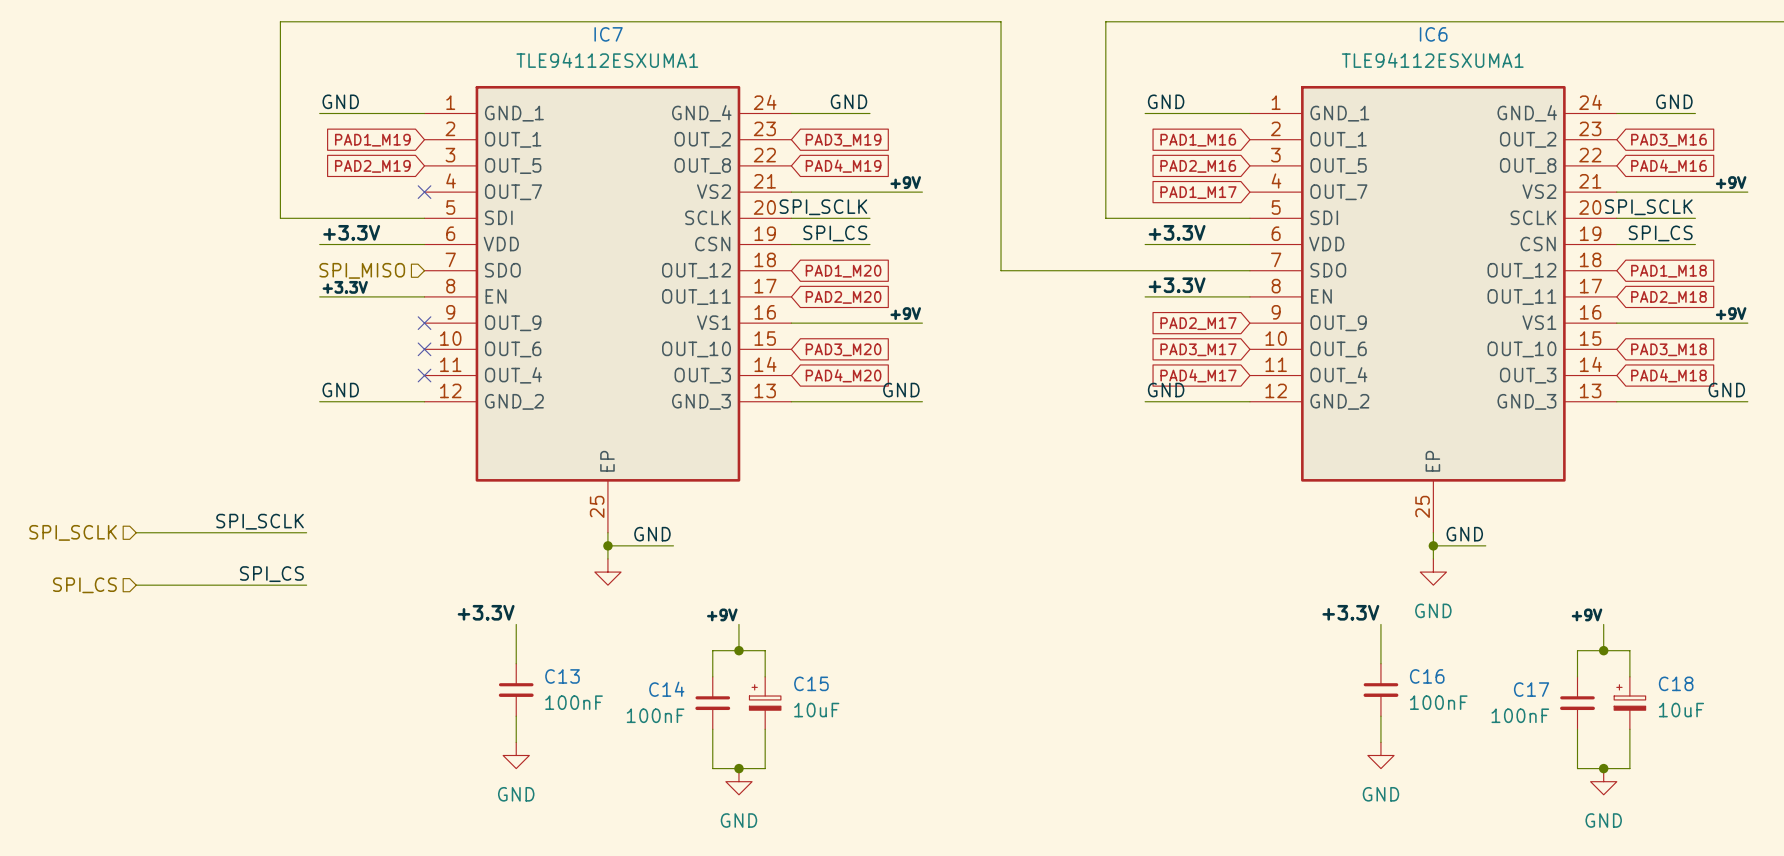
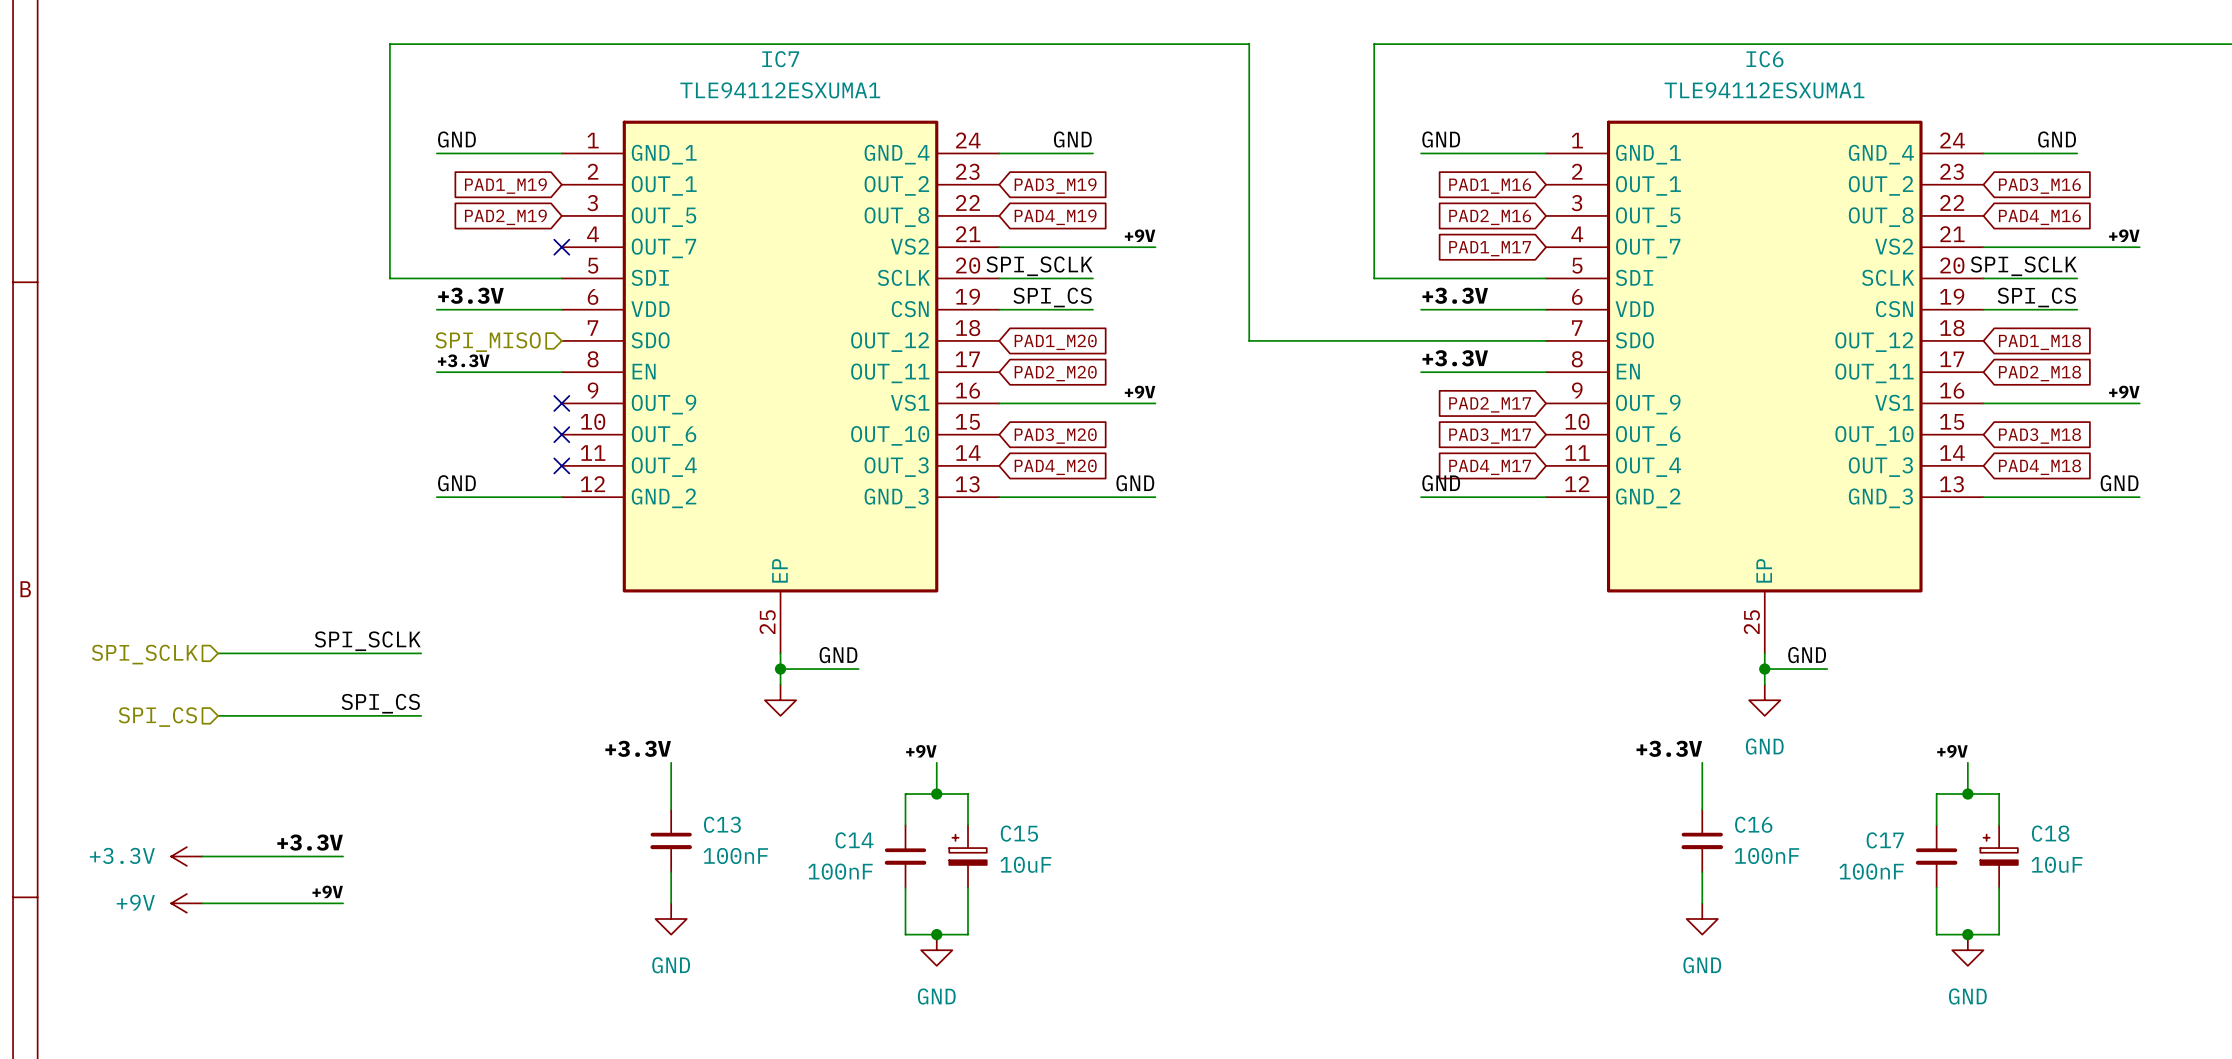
label: none -> +3.3V (310, 842)
power symbol: none -> +3.3V (186, 856)
wire: none -> (202, 856) (343, 856)
label: none -> +9V (327, 891)
power symbol: none -> +9V (186, 903)
wire: none -> (202, 903) (343, 903)

